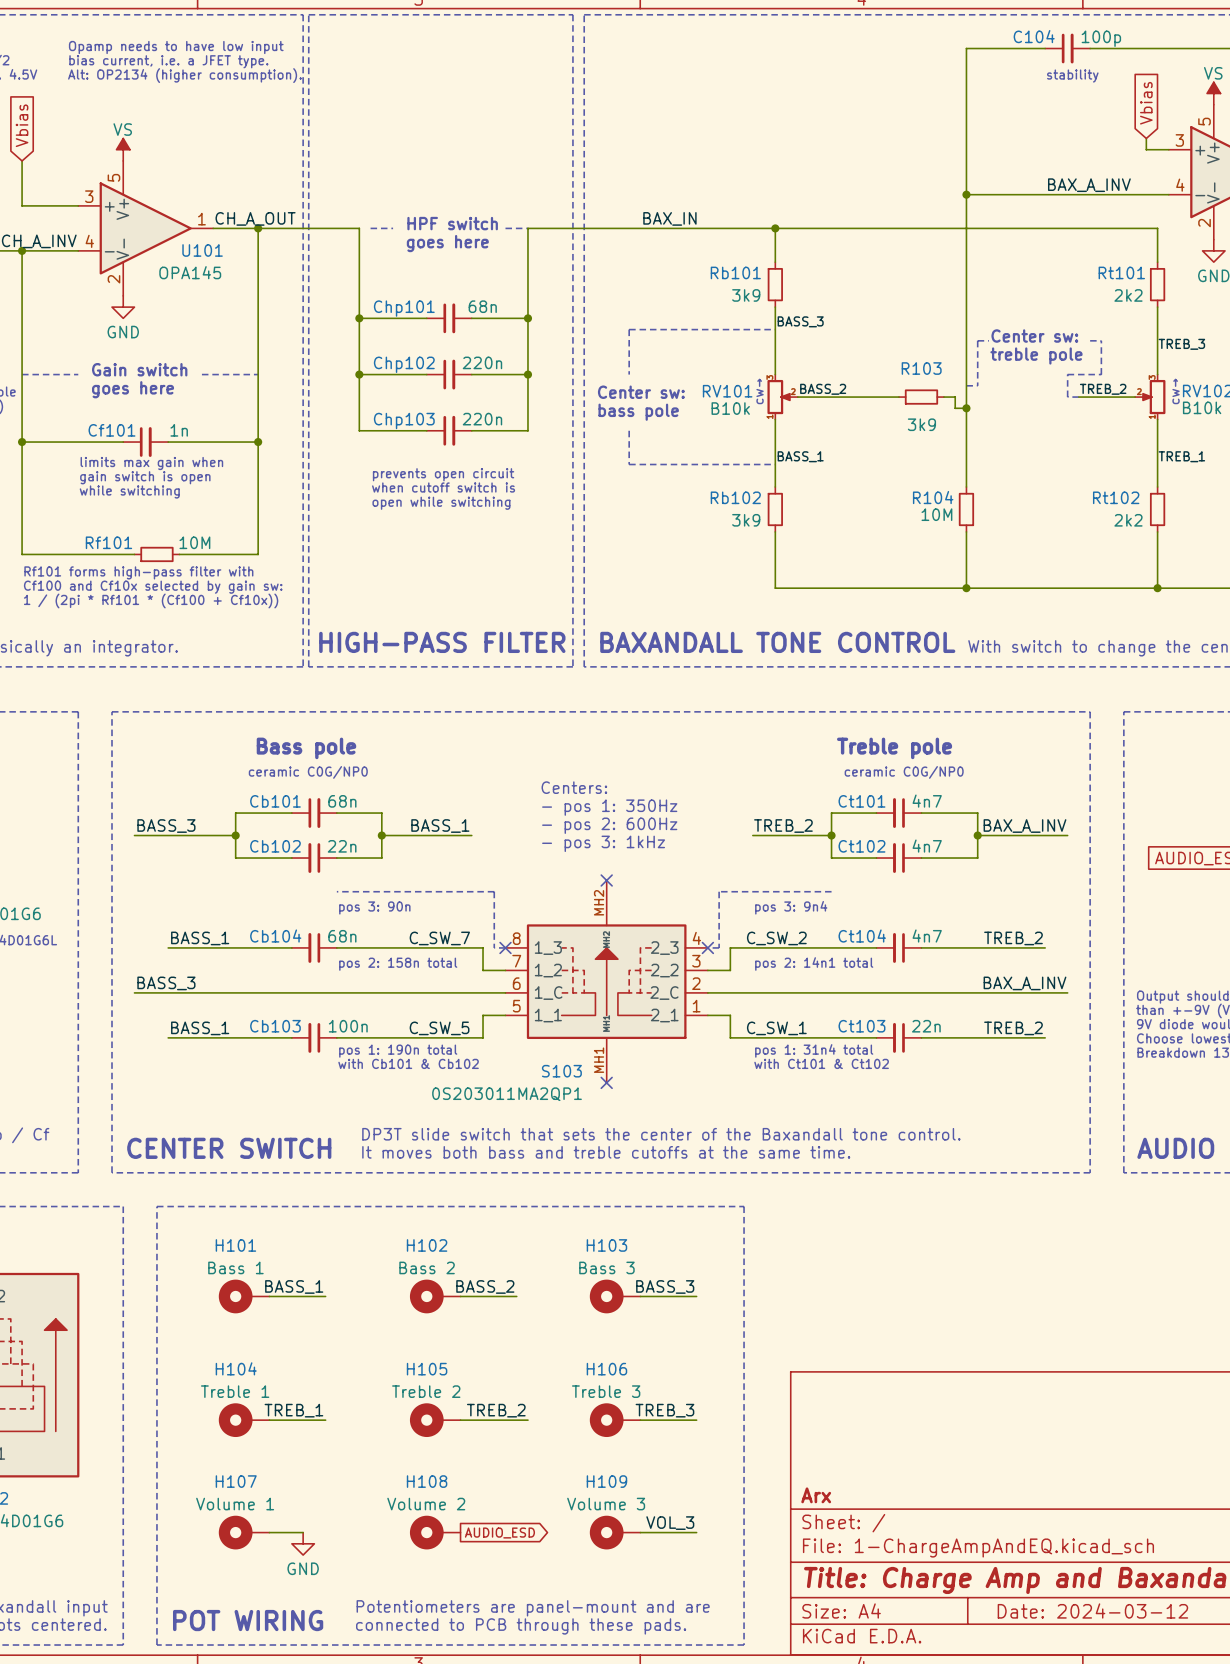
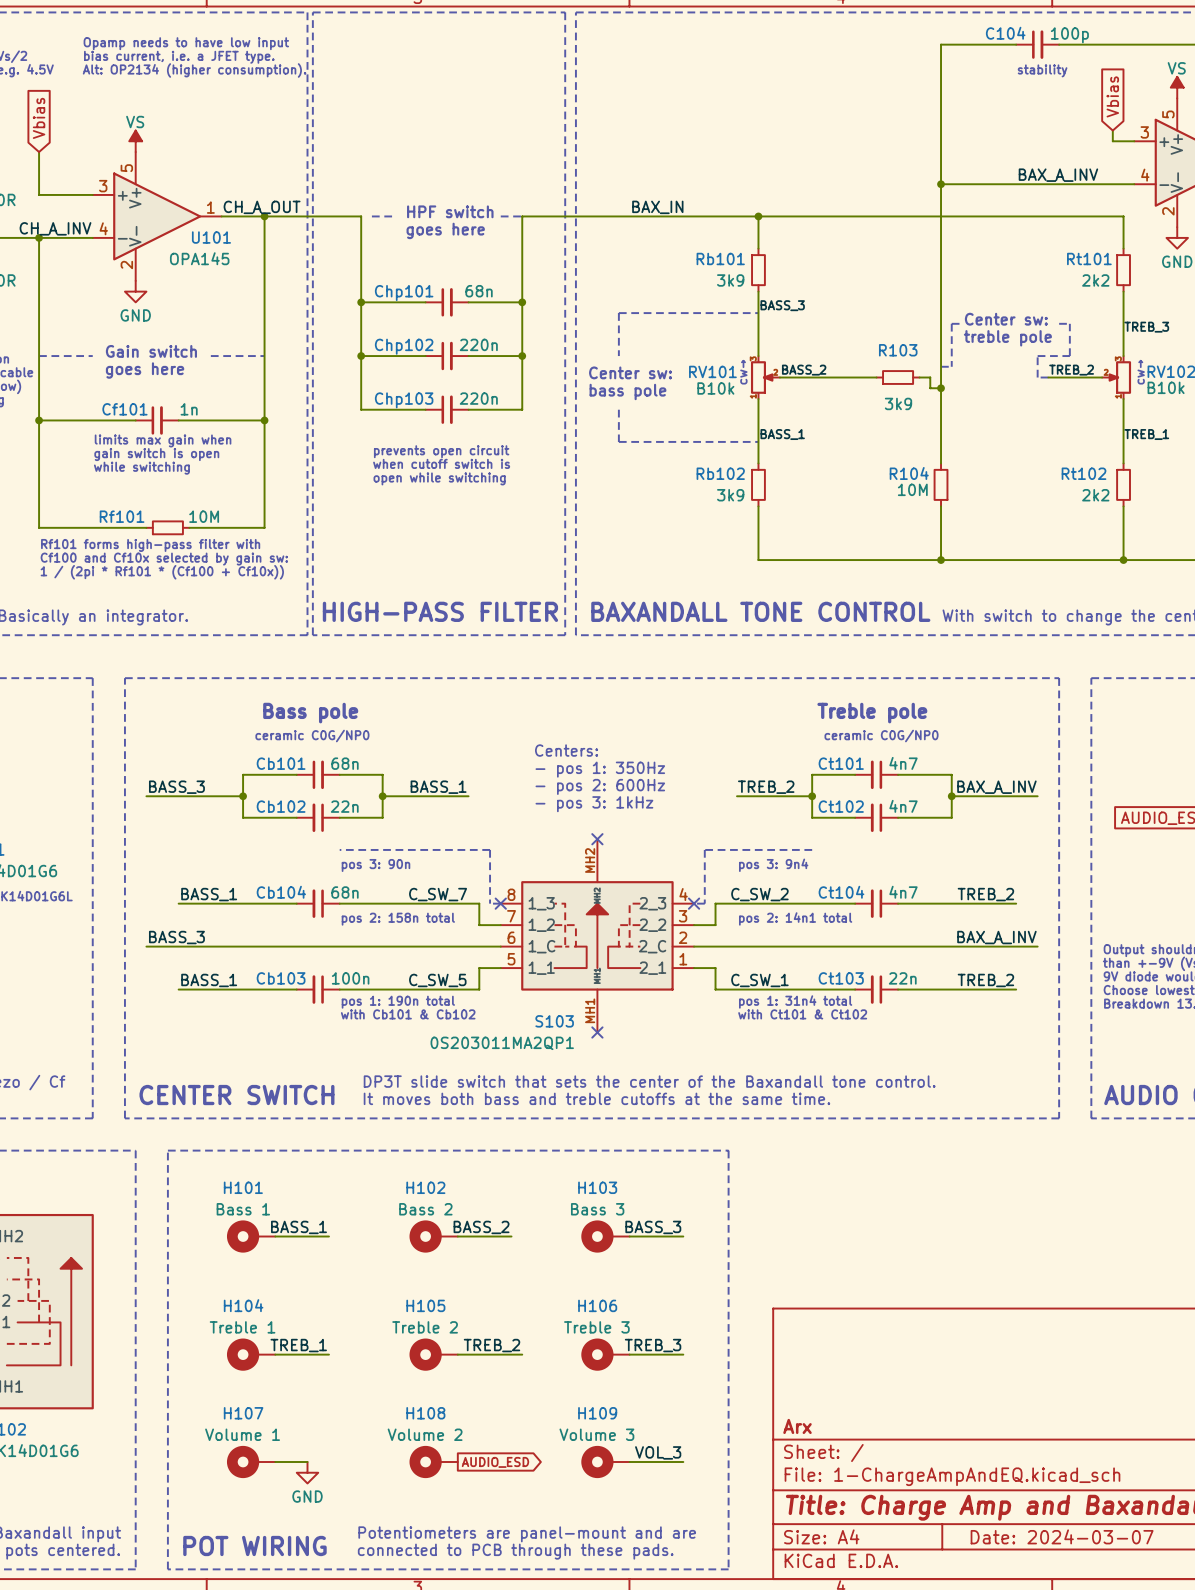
title block: Date: 2024-03-12 (1092, 1611) -> Date: 2024-03-07 (1062, 1536)

